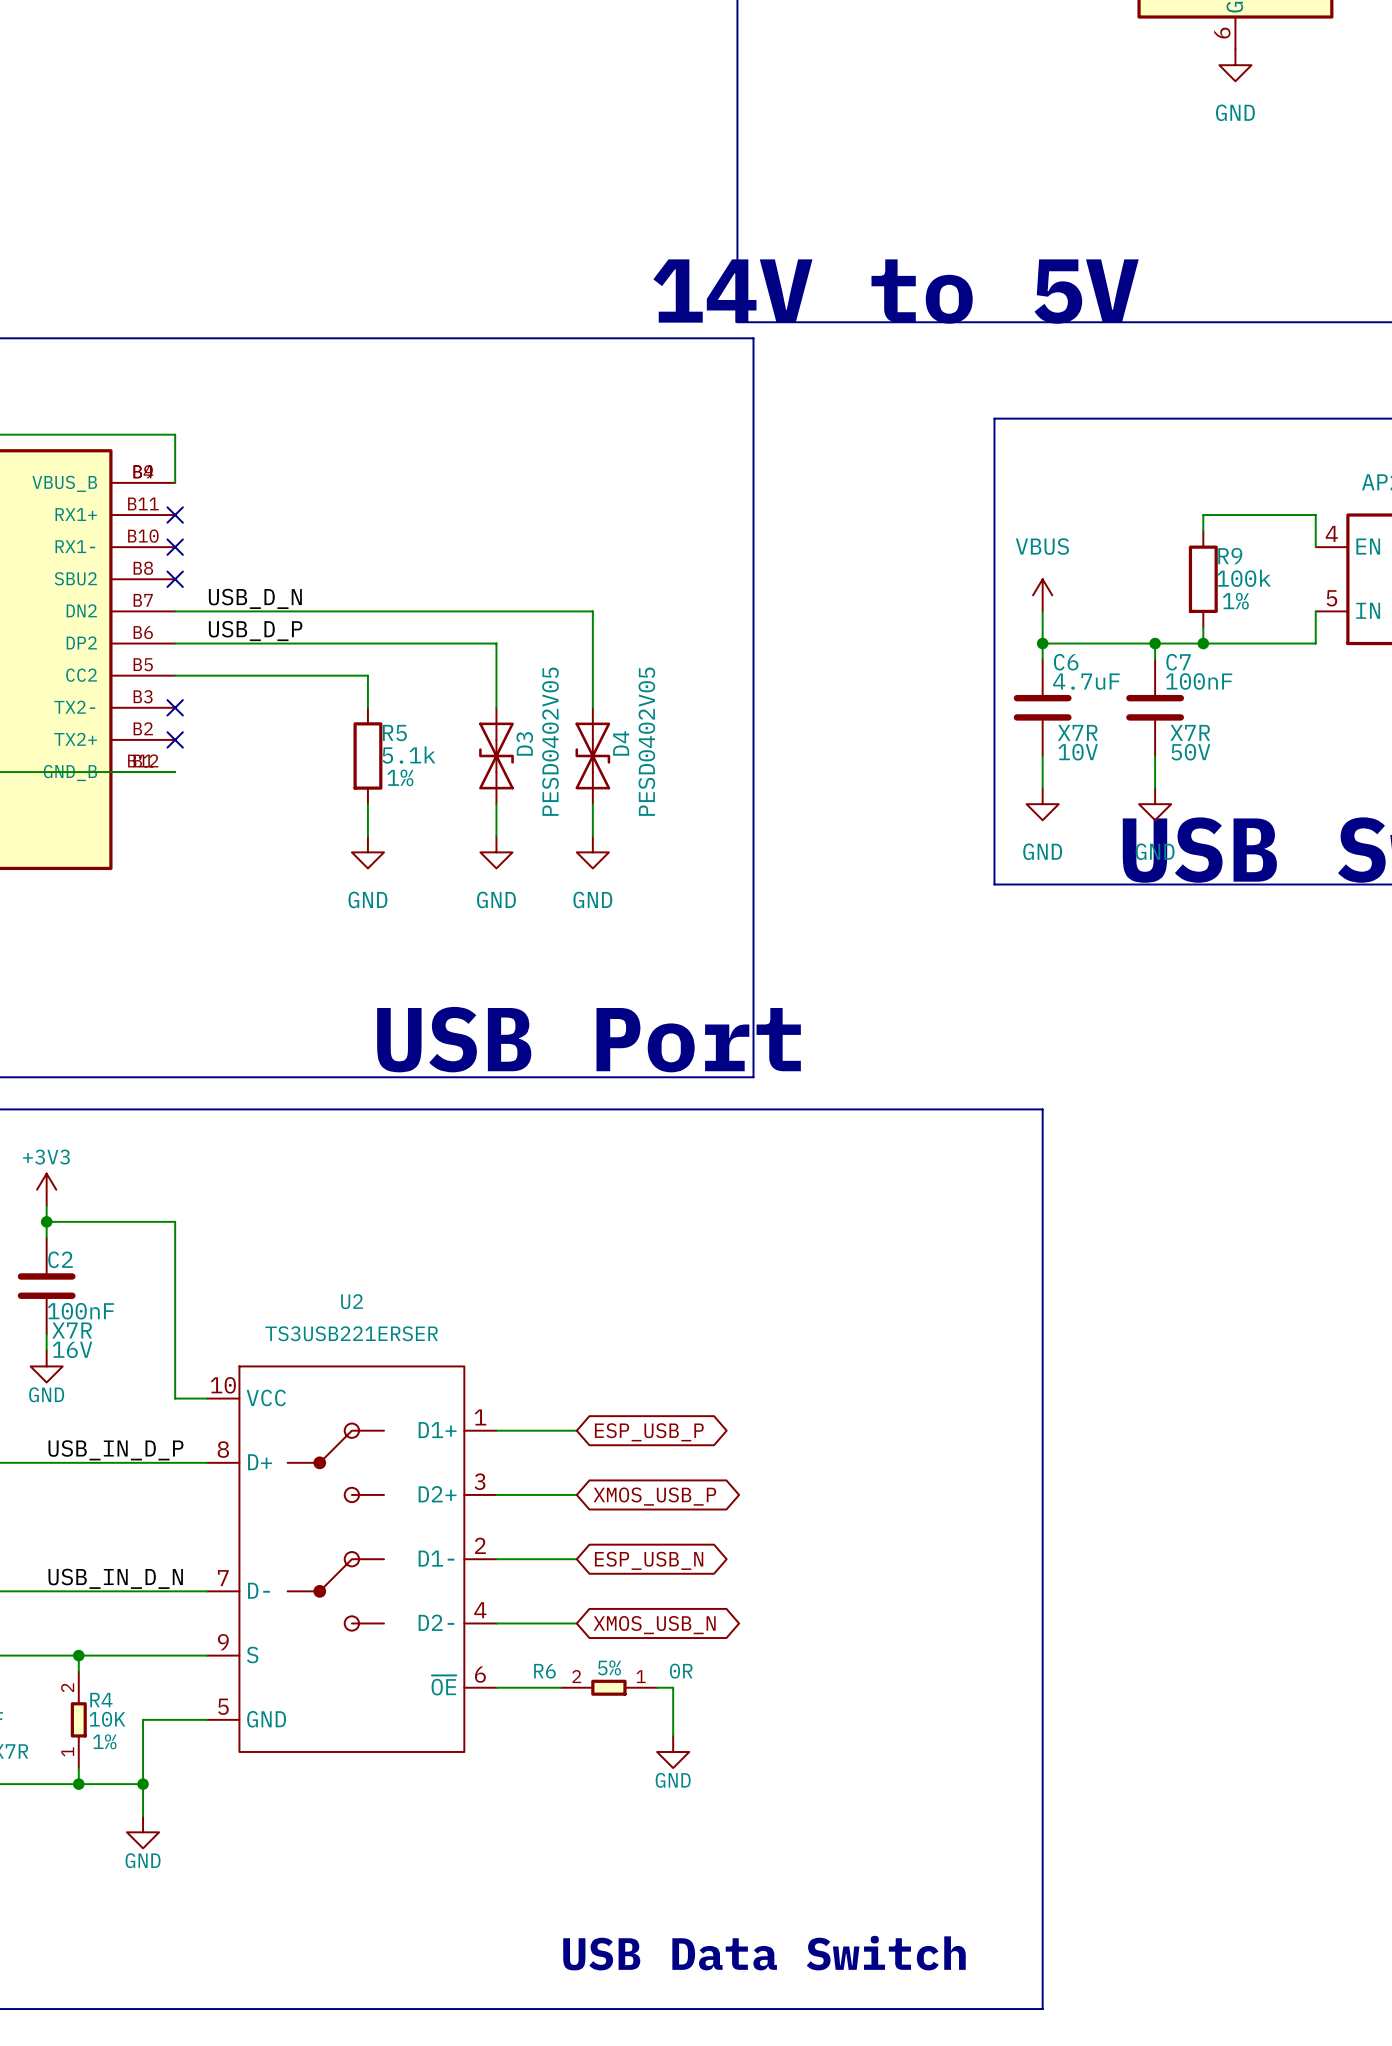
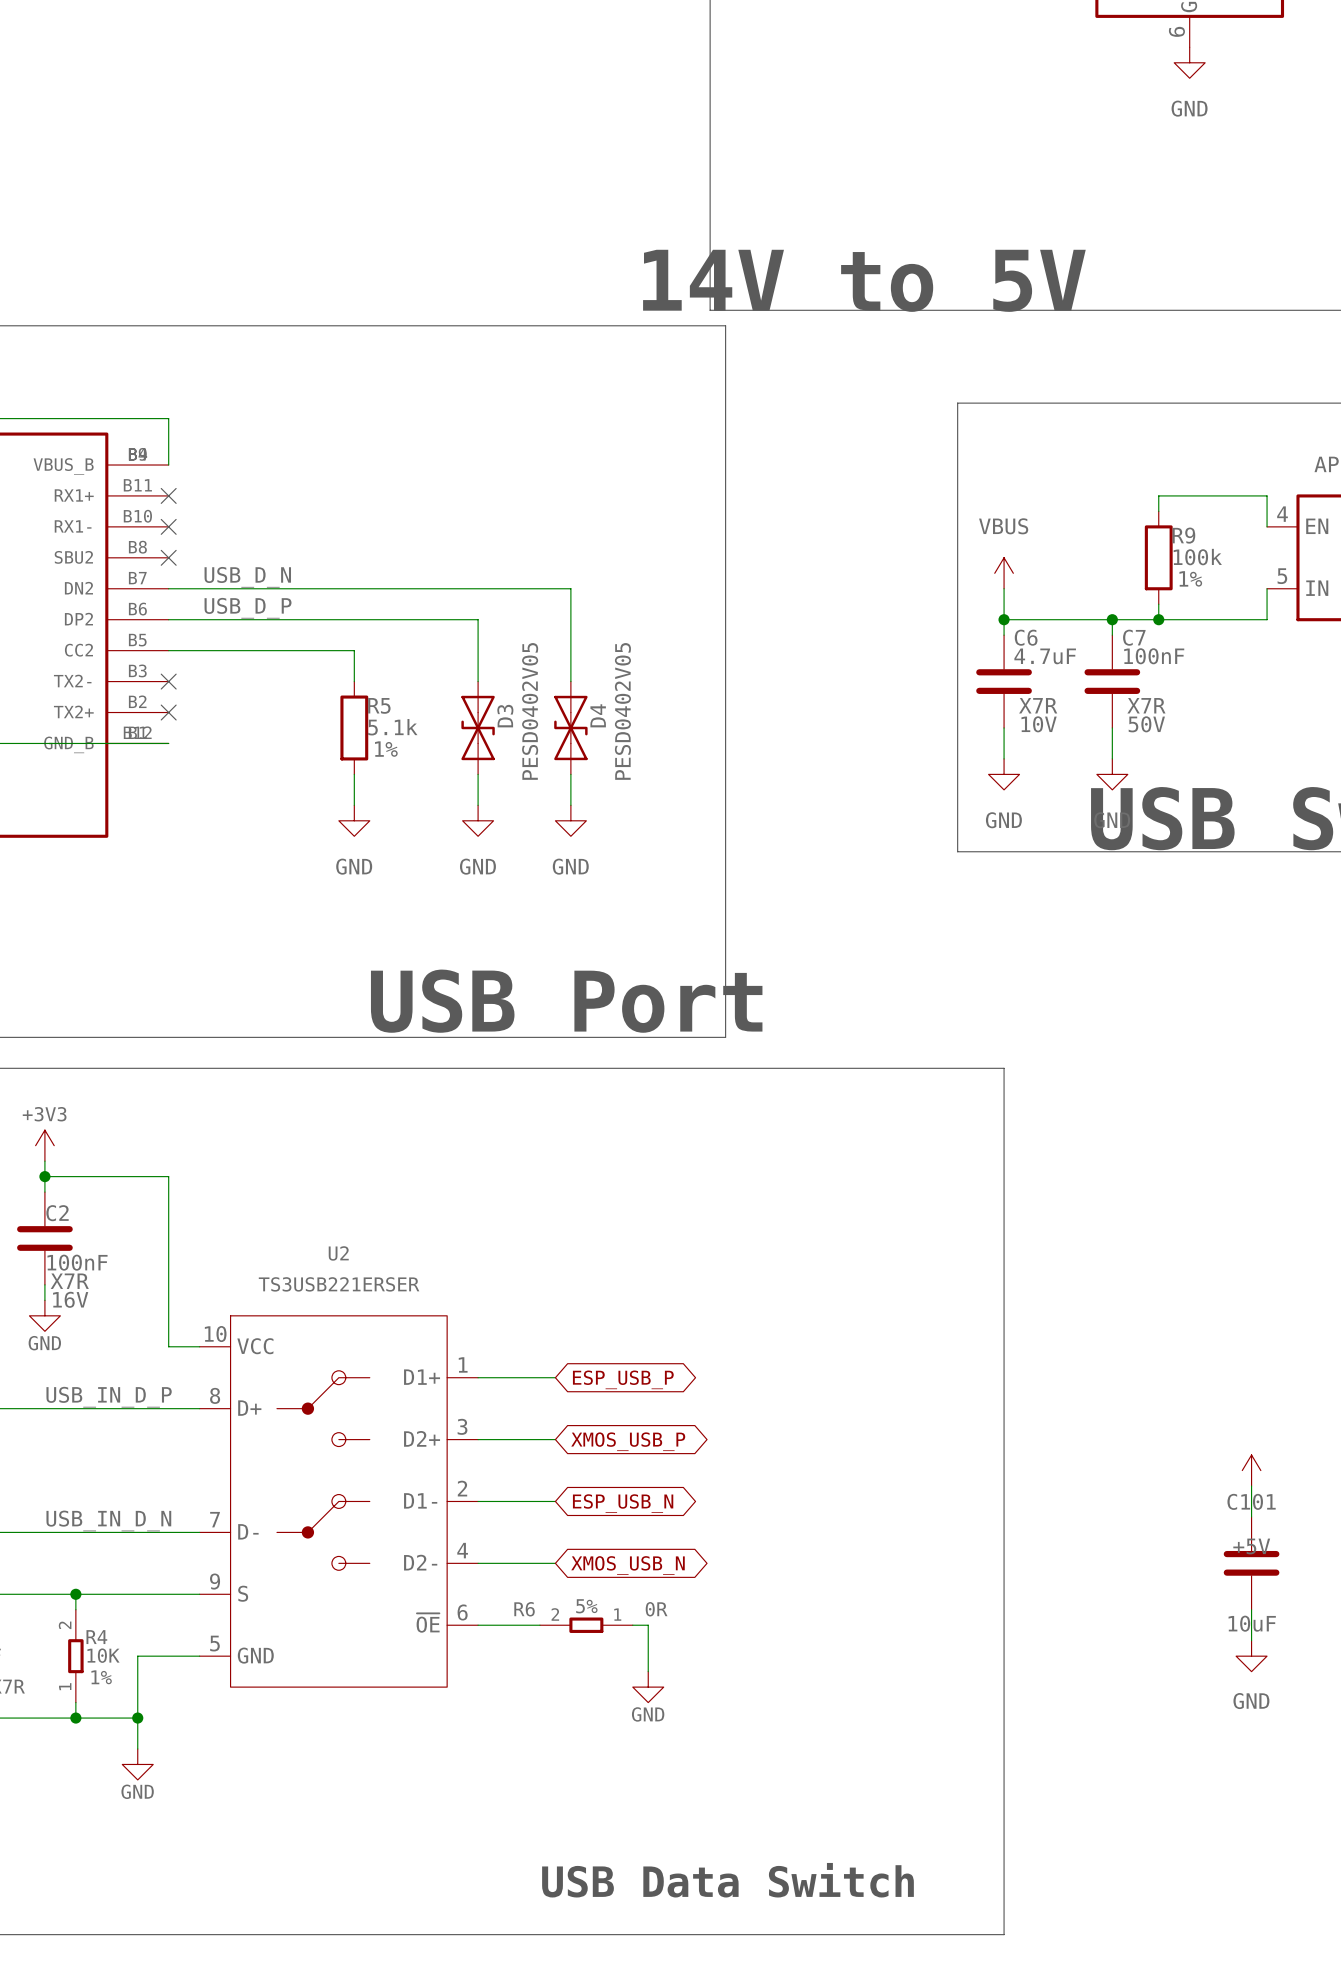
power symbol: none -> +5V (1251, 1470)
wire: none -> (1251, 1486) (1251, 1516)
C101: none -> 10uF (1251, 1563)
wire: none -> (1251, 1609) (1251, 1640)
power symbol: none -> GND (1251, 1656)

